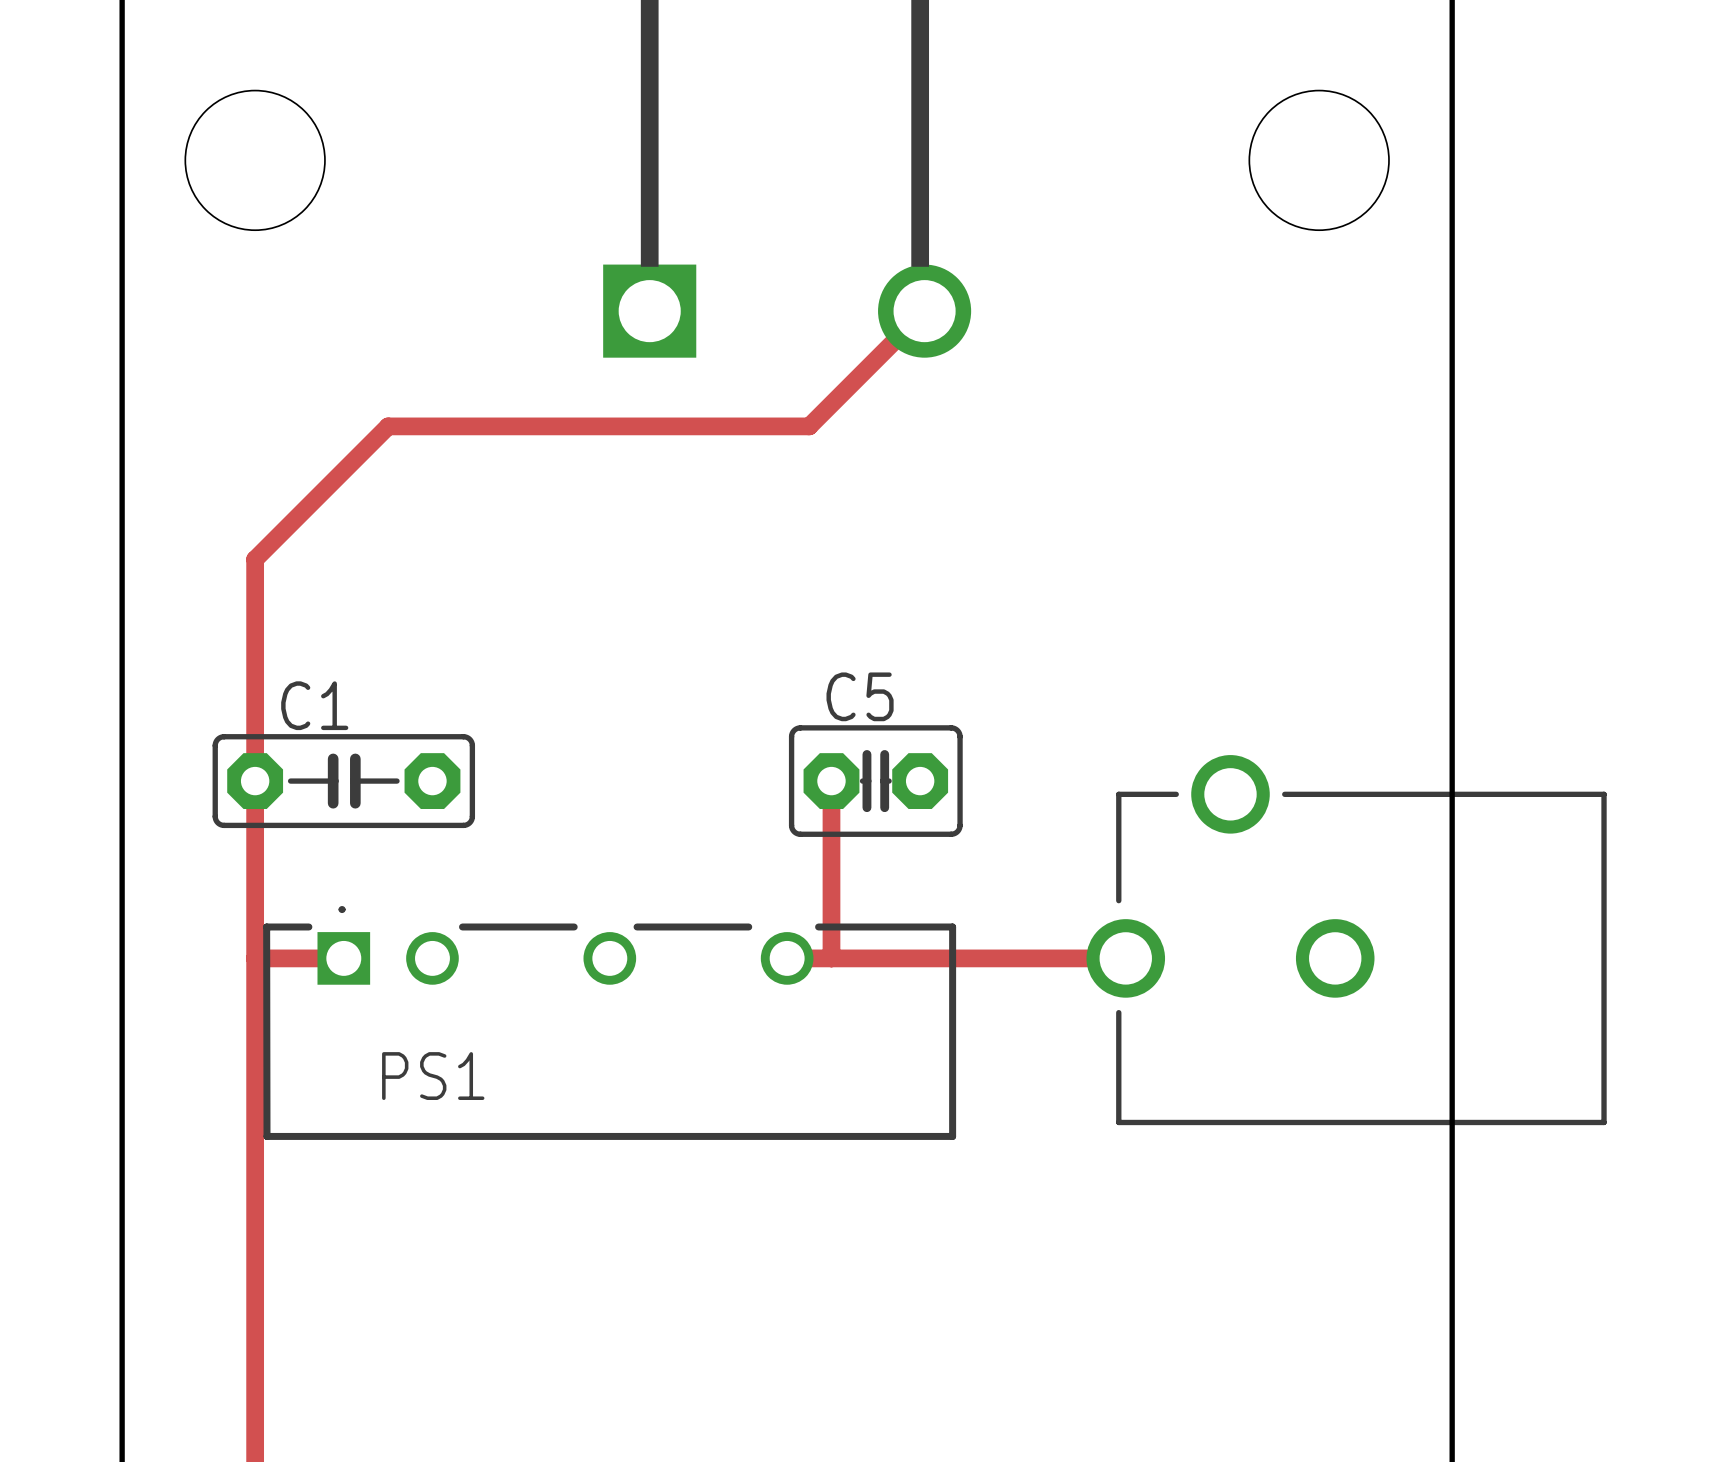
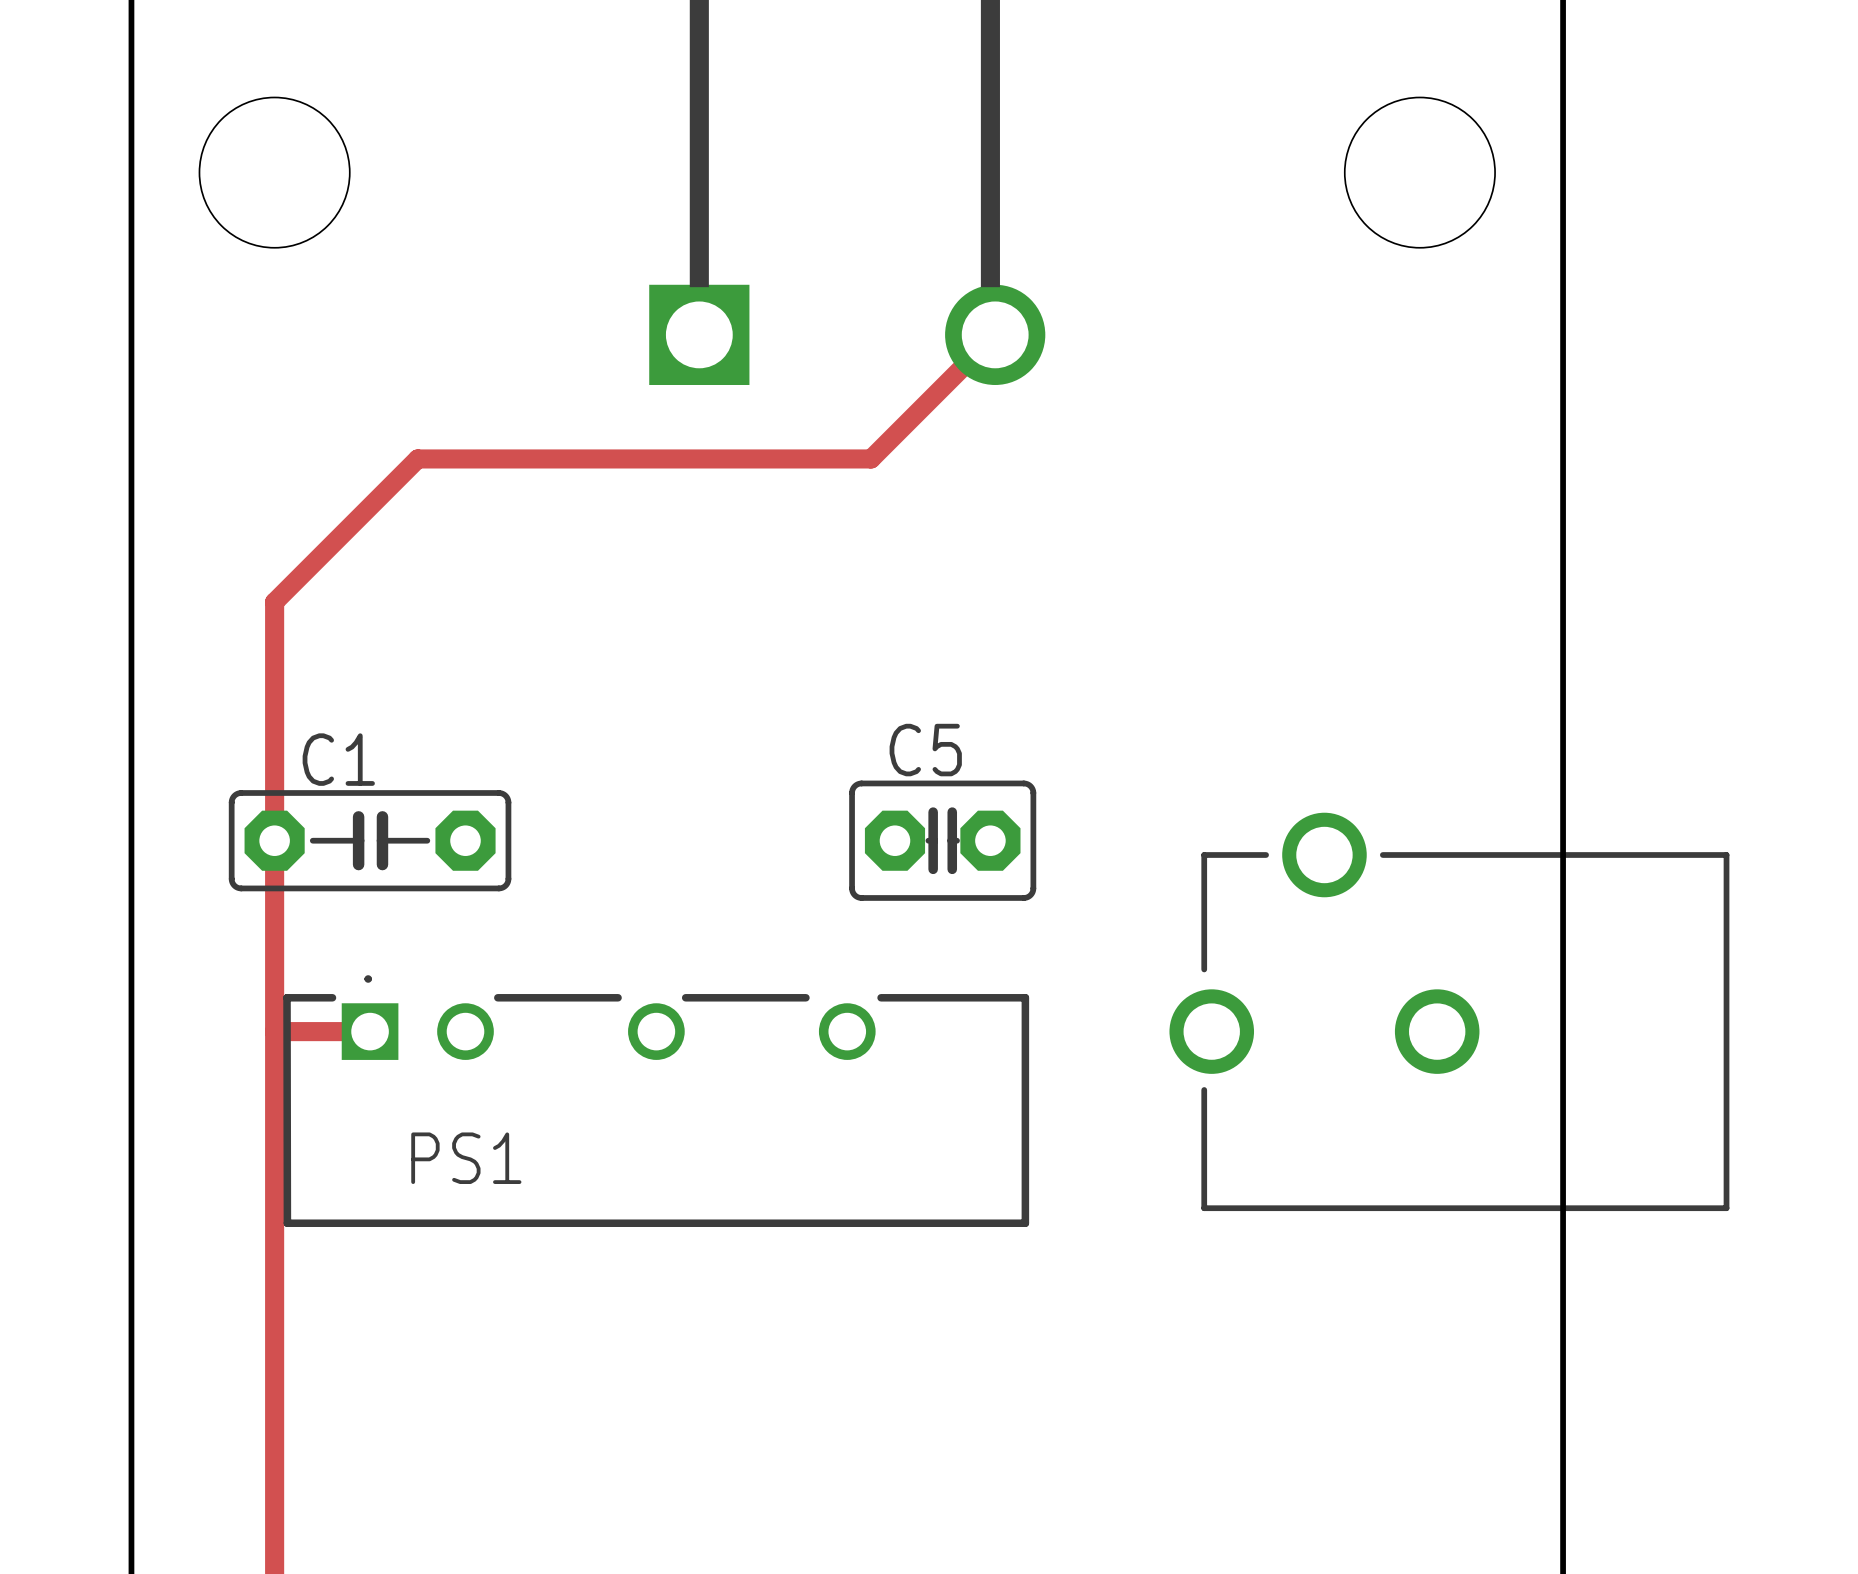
track: (831, 781) (831, 958) -> none
track: (787, 958) (1125, 958) -> none

